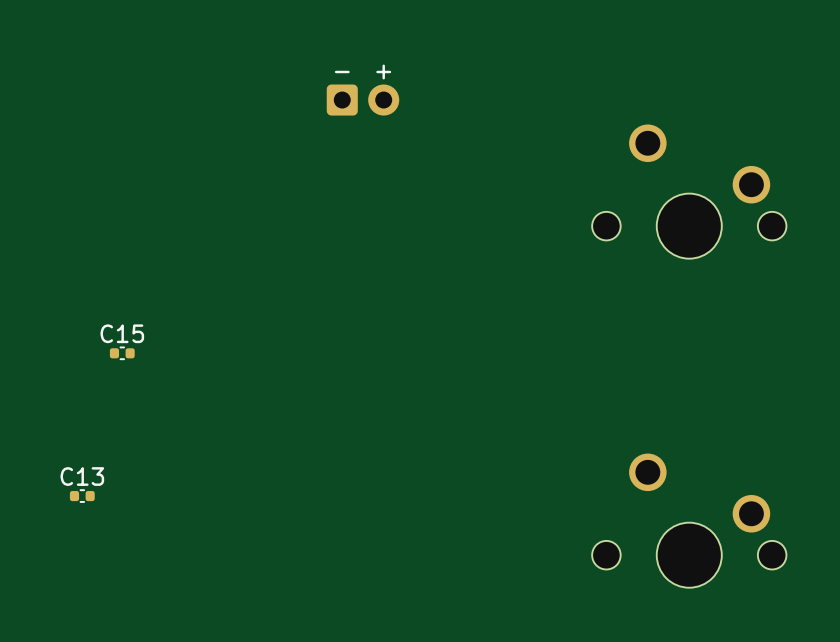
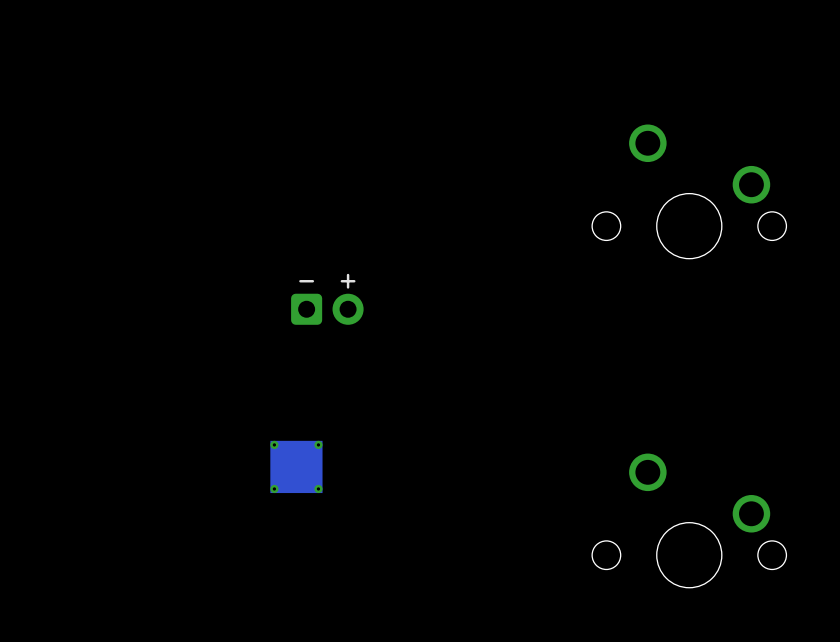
part position: (362, 100) -> (327, 309)
C15: (122, 353) -> none
part: none -> (296, 466)
C13: (82, 496) -> none

